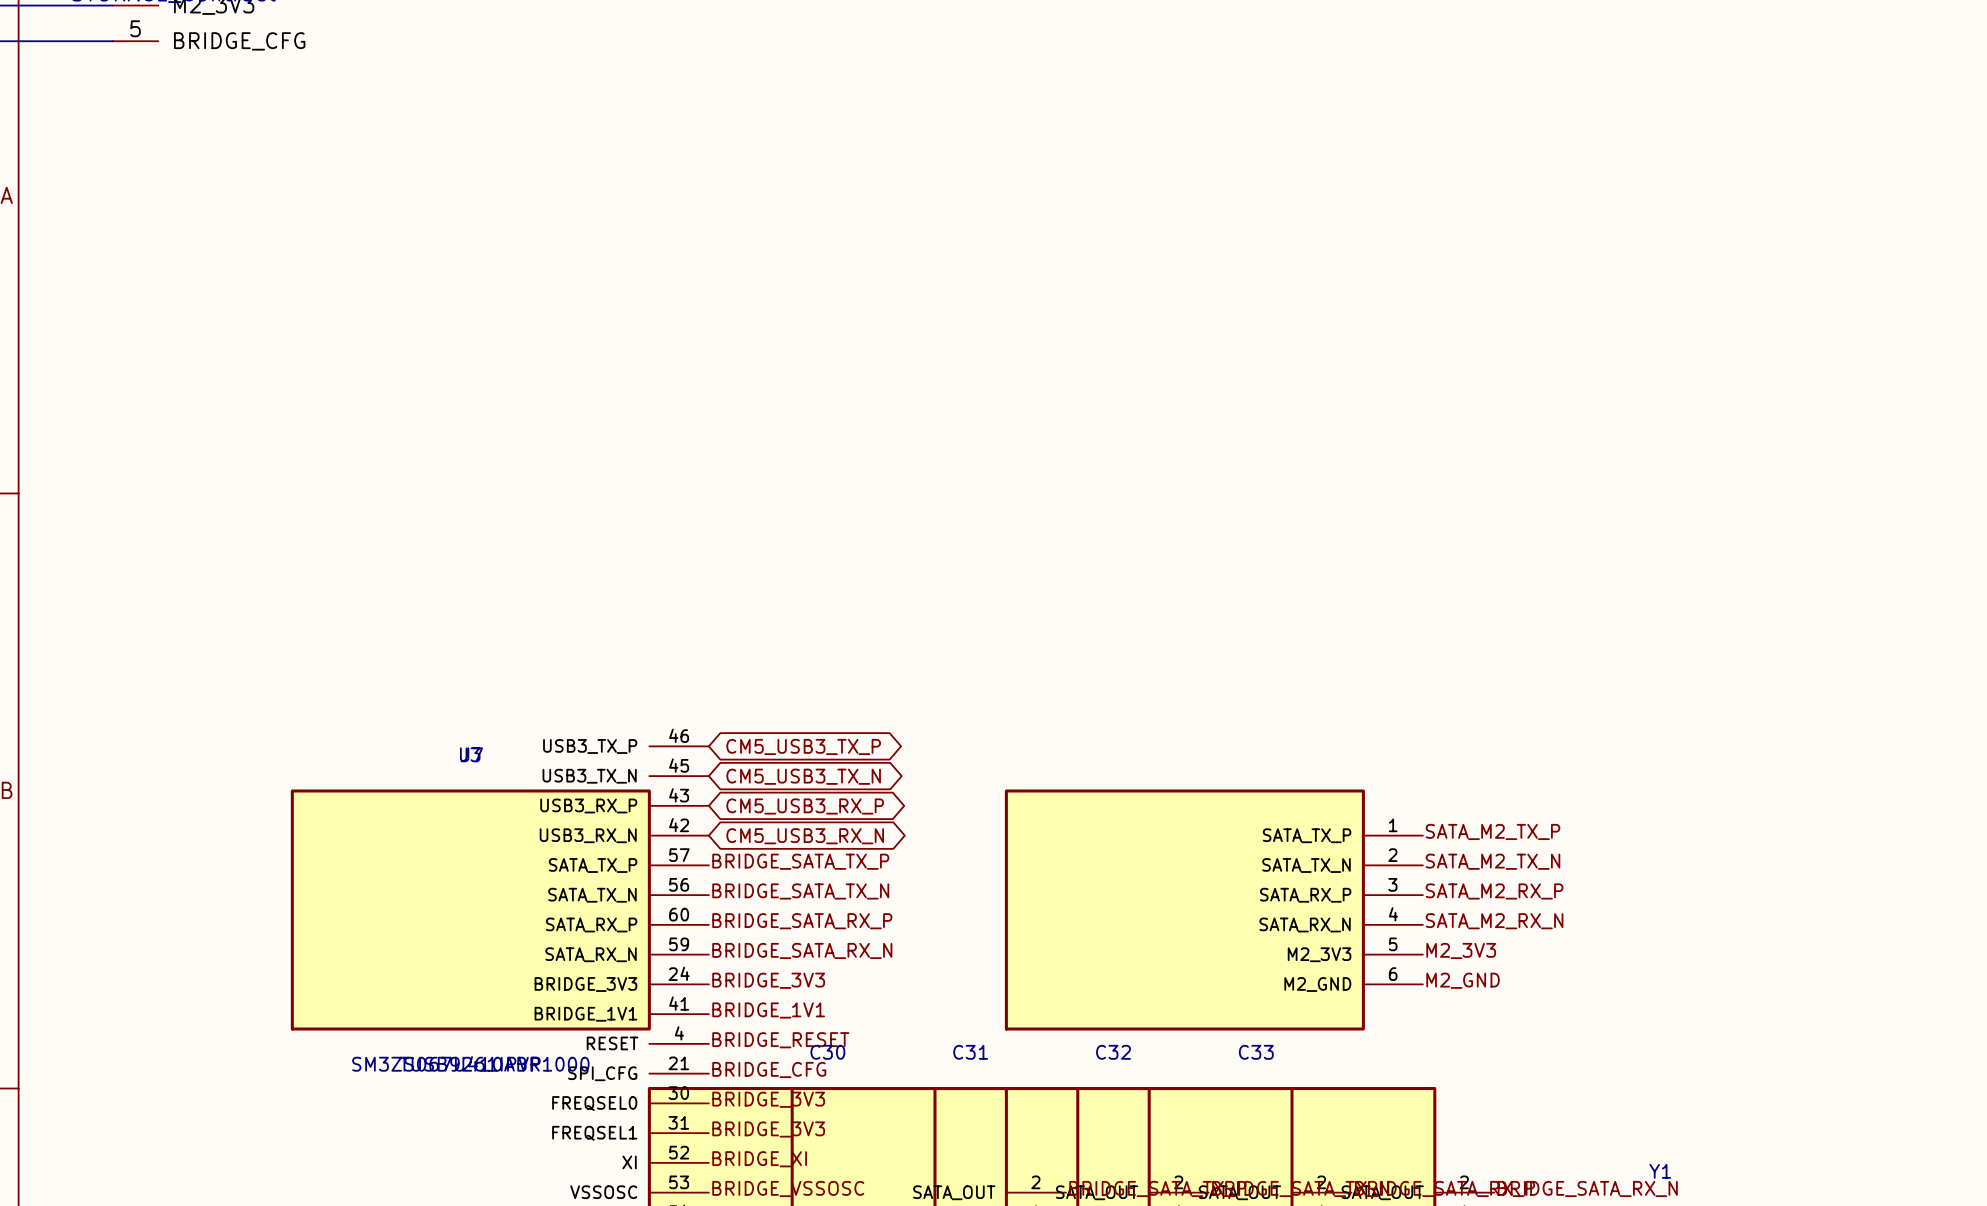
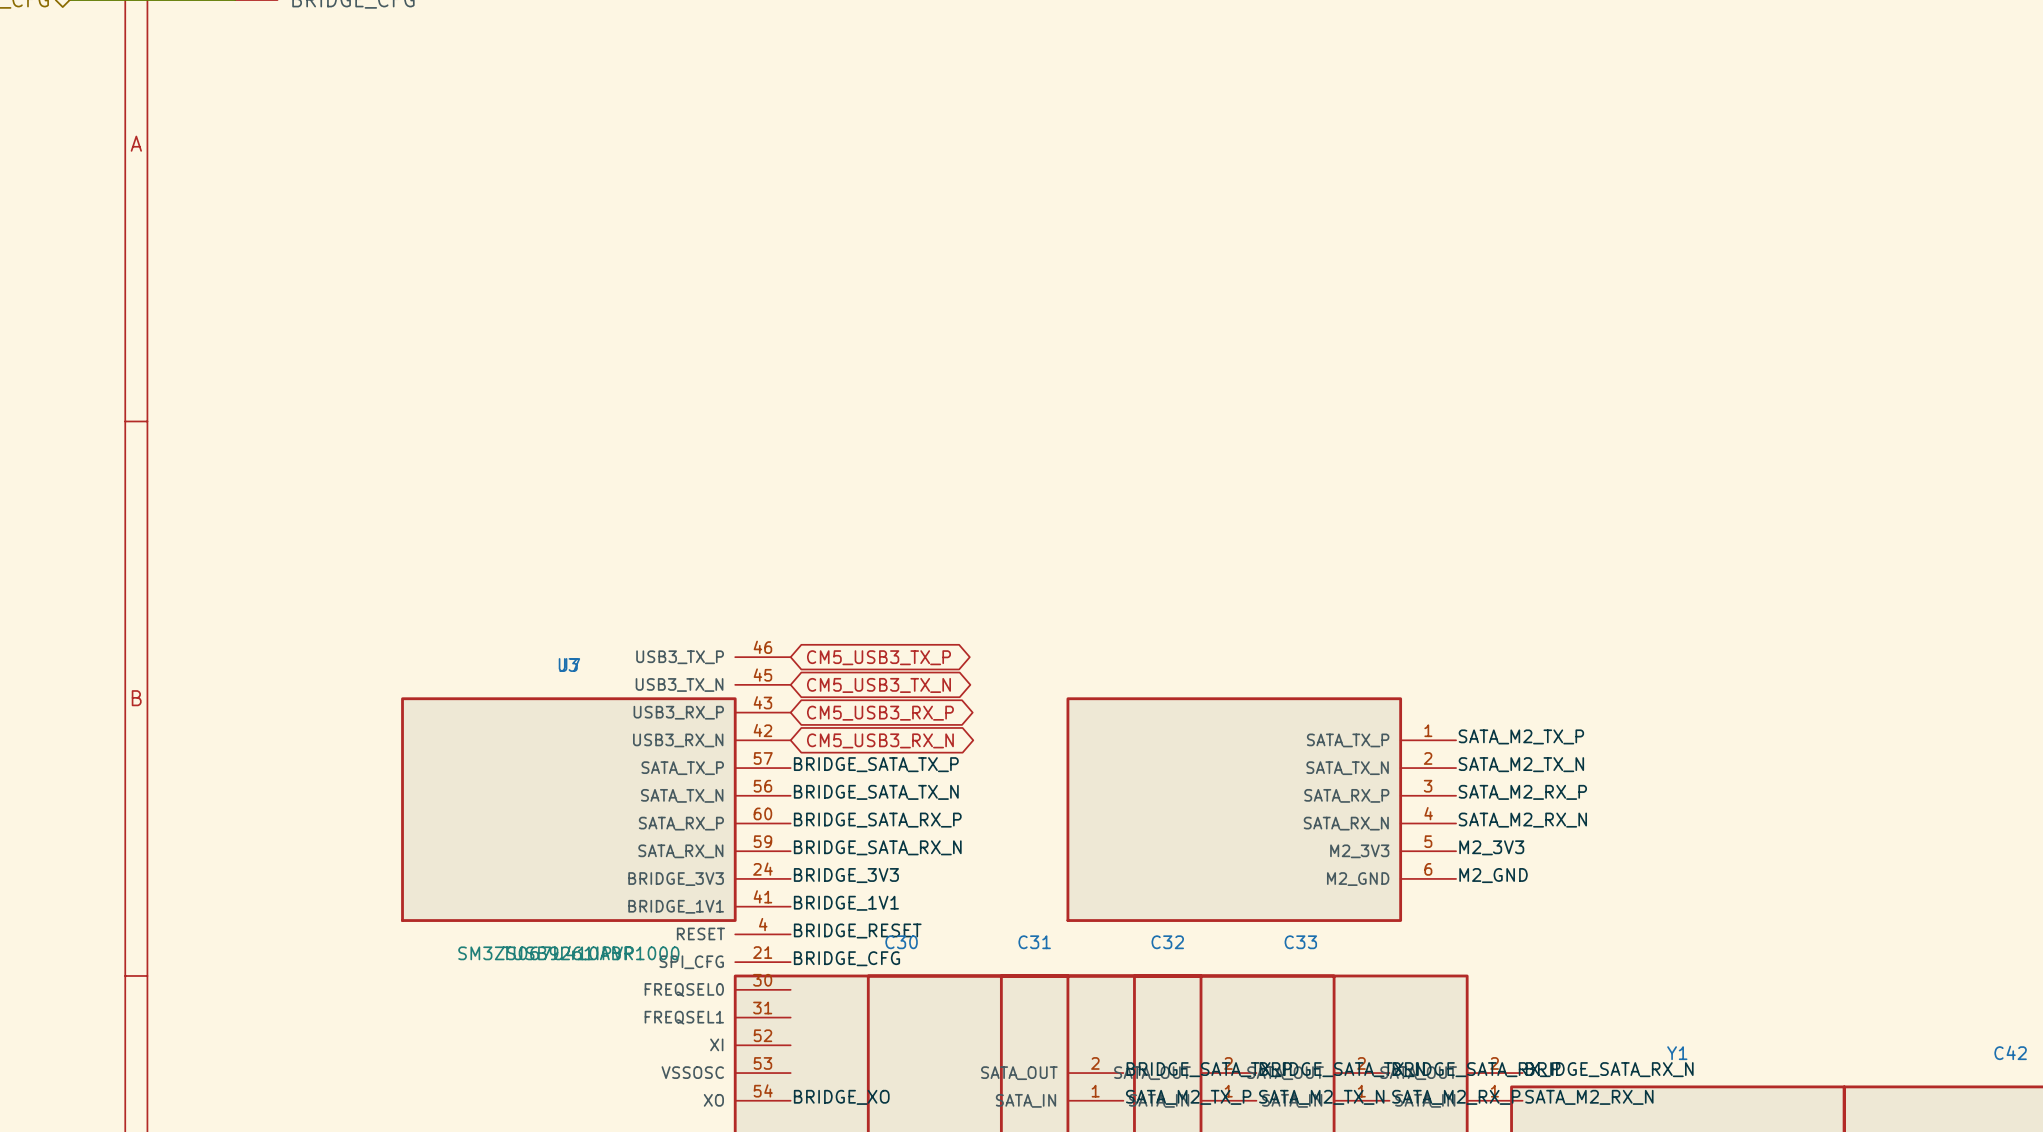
label: BRIDGE_3V3 (768, 1099) -> none
label: BRIDGE_3V3 (768, 1129) -> none
label: BRIDGE_XI (759, 1159) -> none
label: BRIDGE_VSSOSC (788, 1189) -> none

